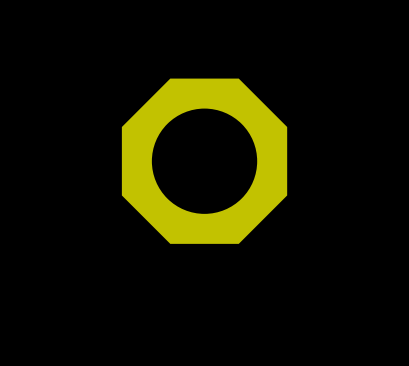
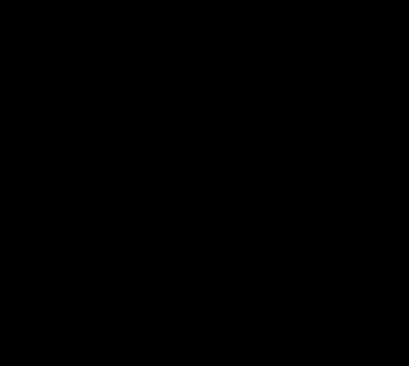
part: (204, 161) -> none

